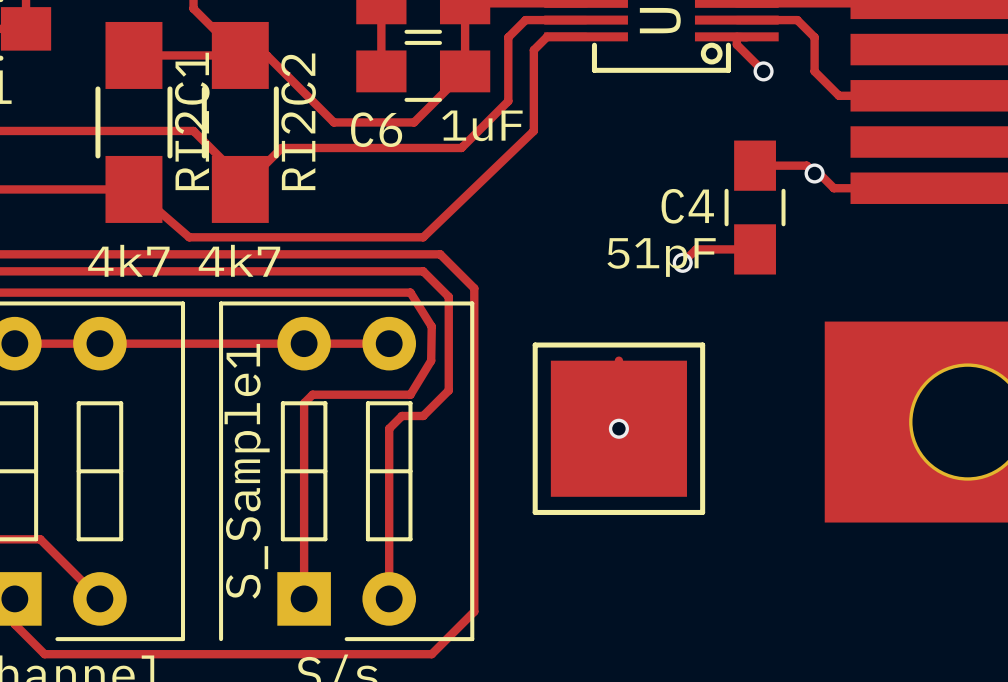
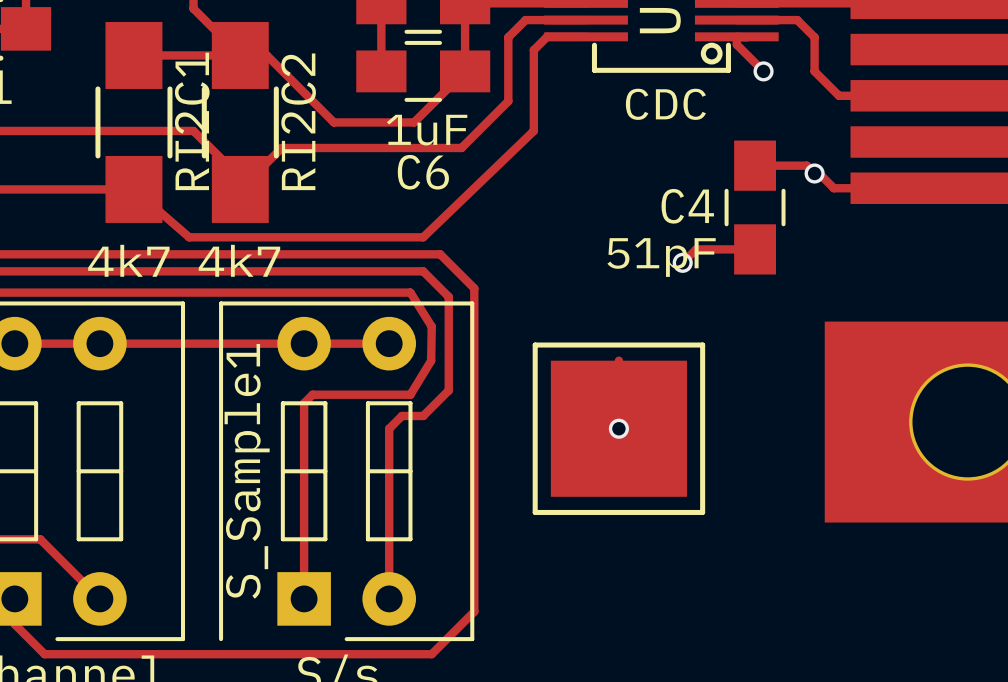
text: none -> CDC (665, 104)
text position: 1uF (482, 125) -> 1uF (427, 130)
C6 name position: C6 (376, 129) -> C6 (423, 172)

